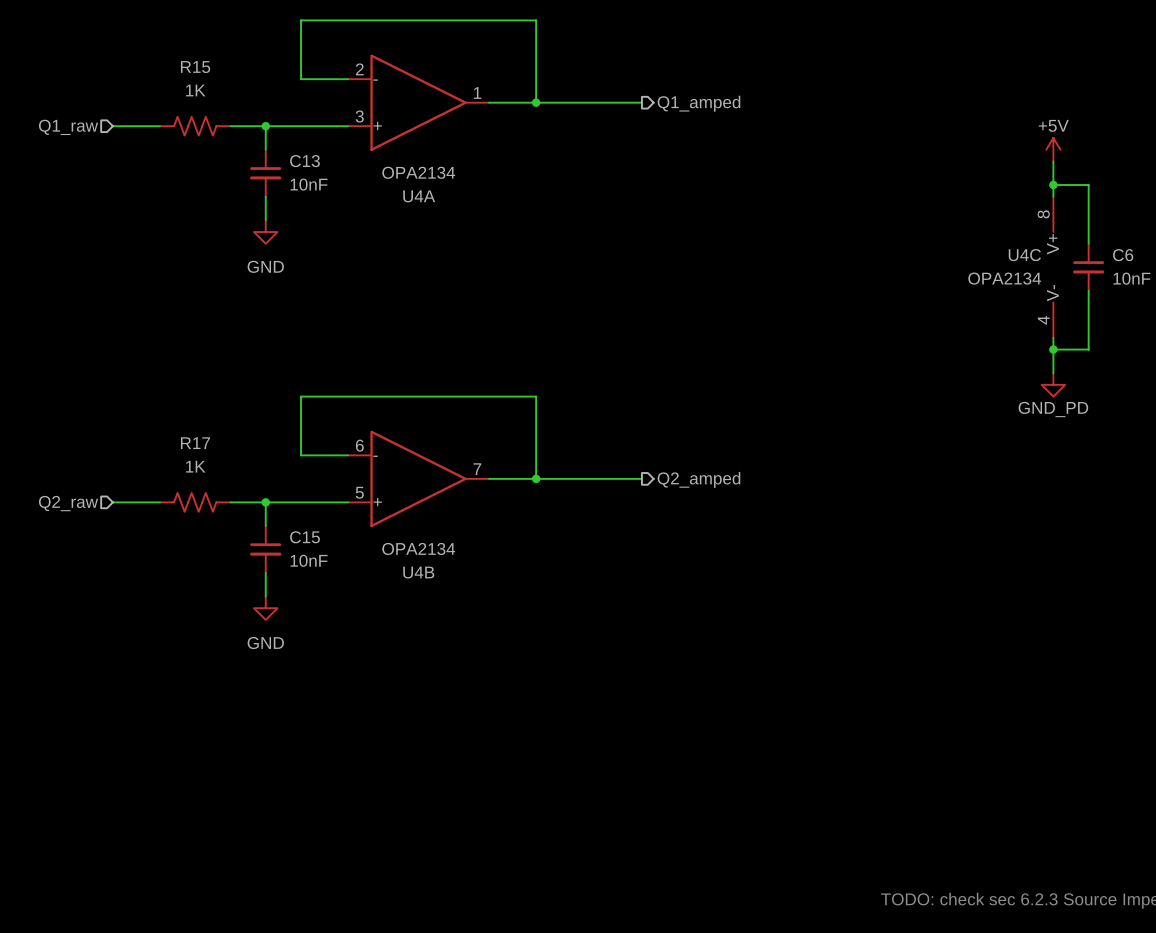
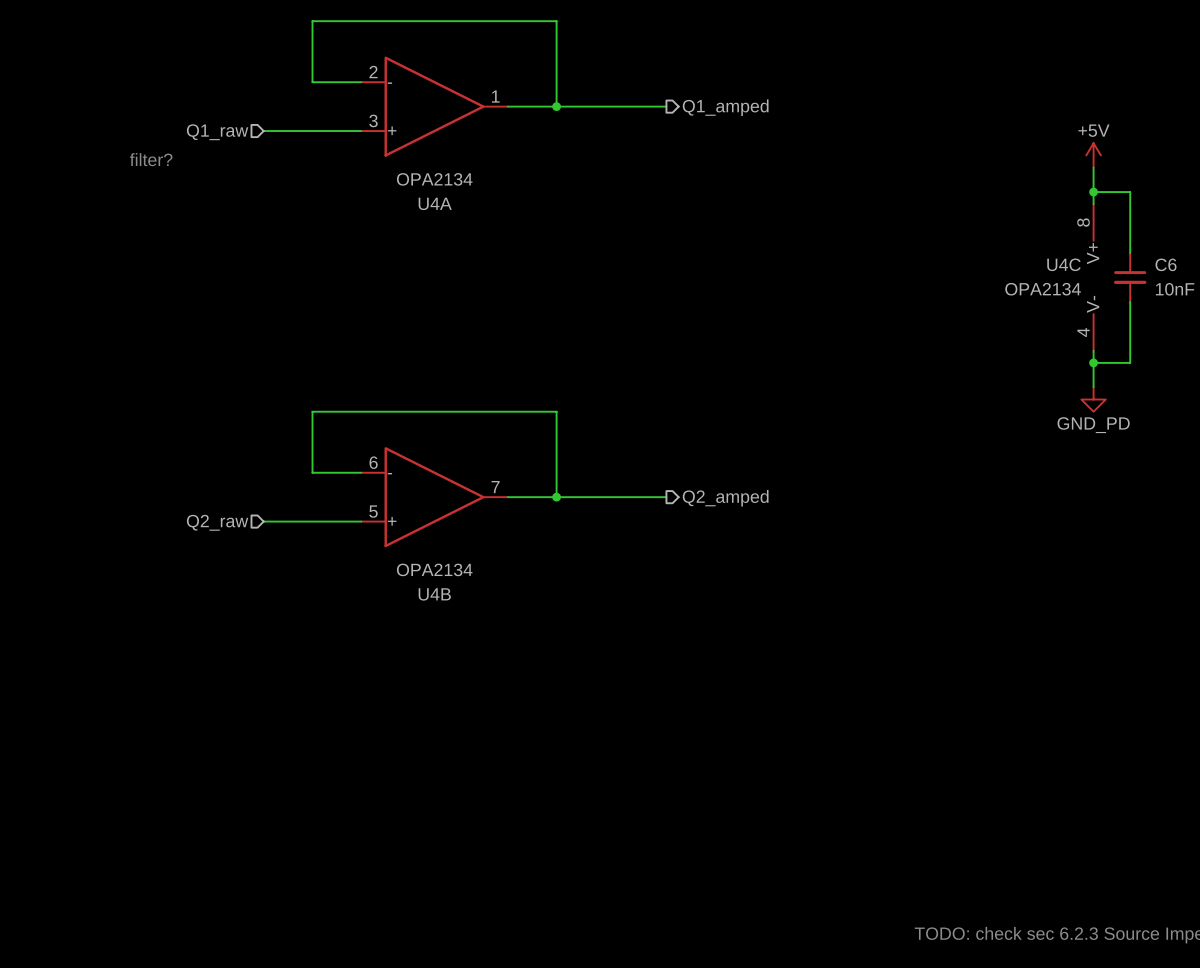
wire: (112, 126) (159, 126) -> none
R15: 1K (195, 126) -> none
wire: (230, 126) (253, 126) -> none
wire: (265, 126) (265, 149) -> none
junction: (265, 126) -> none
hierarchical label position: Q1_raw (68, 127) -> Q1_raw (217, 132)
text: none -> filter? (151, 159)
C13: 10nF (265, 173) -> none
wire: (265, 196) (265, 220) -> none
power symbol: GND (265, 232) -> none
wire: (112, 502) (159, 502) -> none
R17: 1K (195, 502) -> none
wire: (230, 502) (253, 502) -> none
wire: (265, 502) (265, 525) -> none
junction: (265, 502) -> none
hierarchical label position: Q2_raw (68, 503) -> Q2_raw (217, 522)
C15: 10nF (265, 549) -> none
wire: (265, 572) (265, 596) -> none
power symbol: GND (265, 608) -> none

